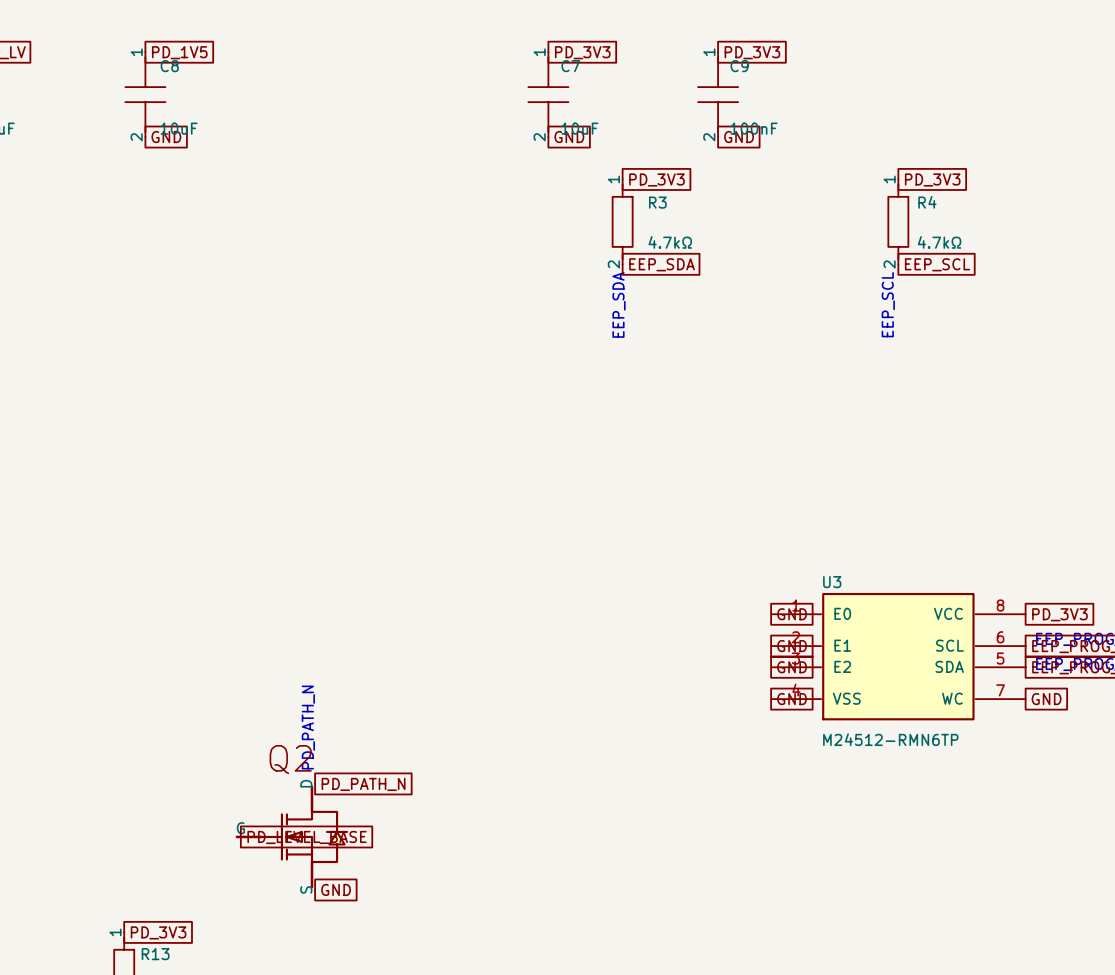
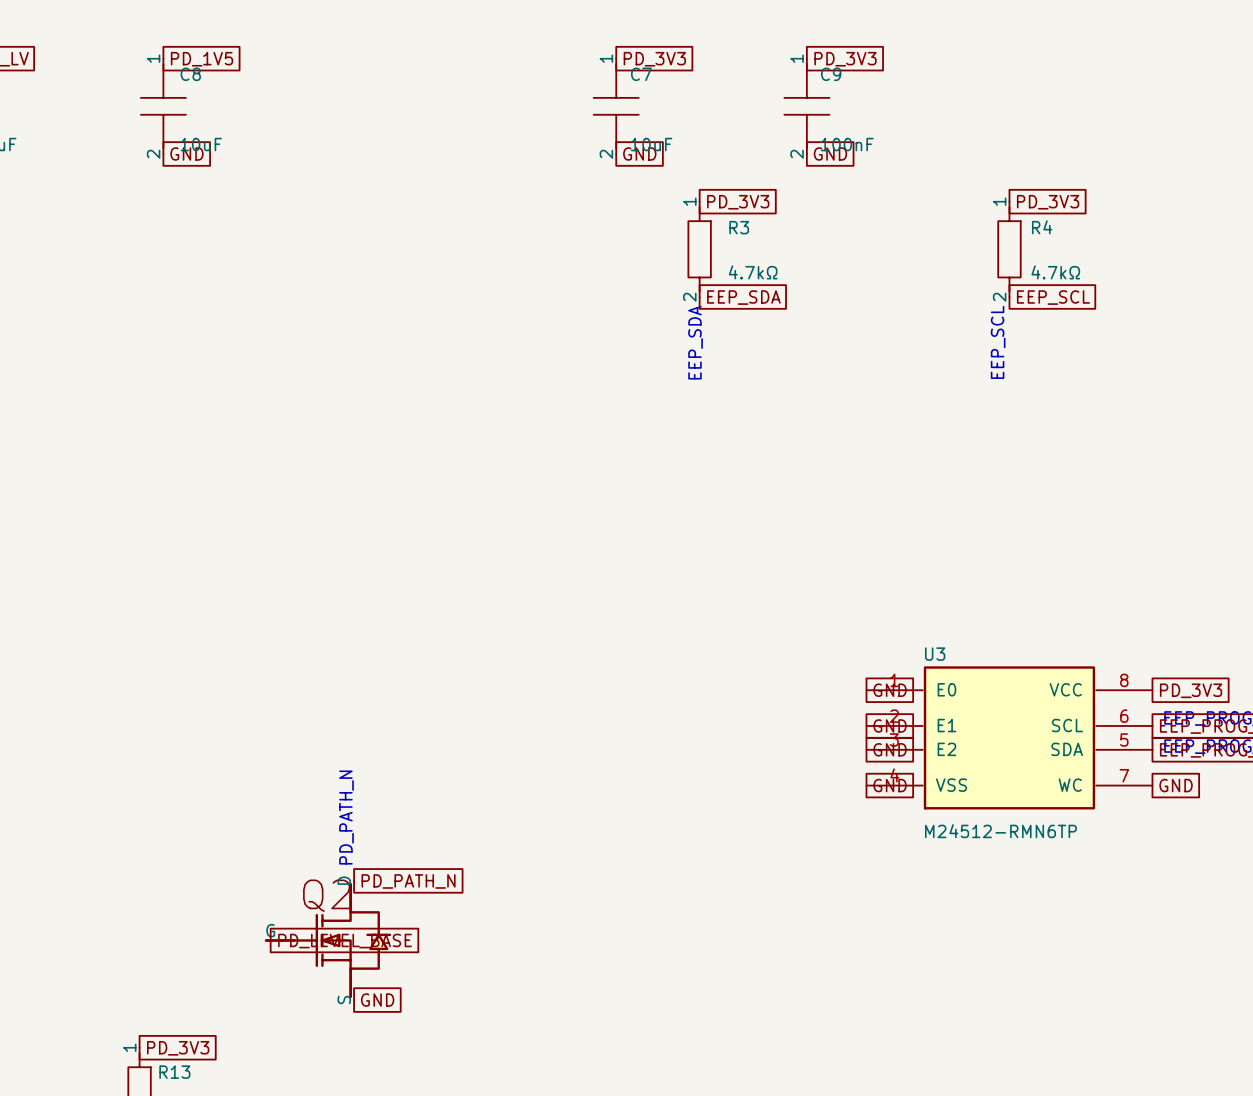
part text position: Q2 (290, 759) -> Q2 (326, 895)

